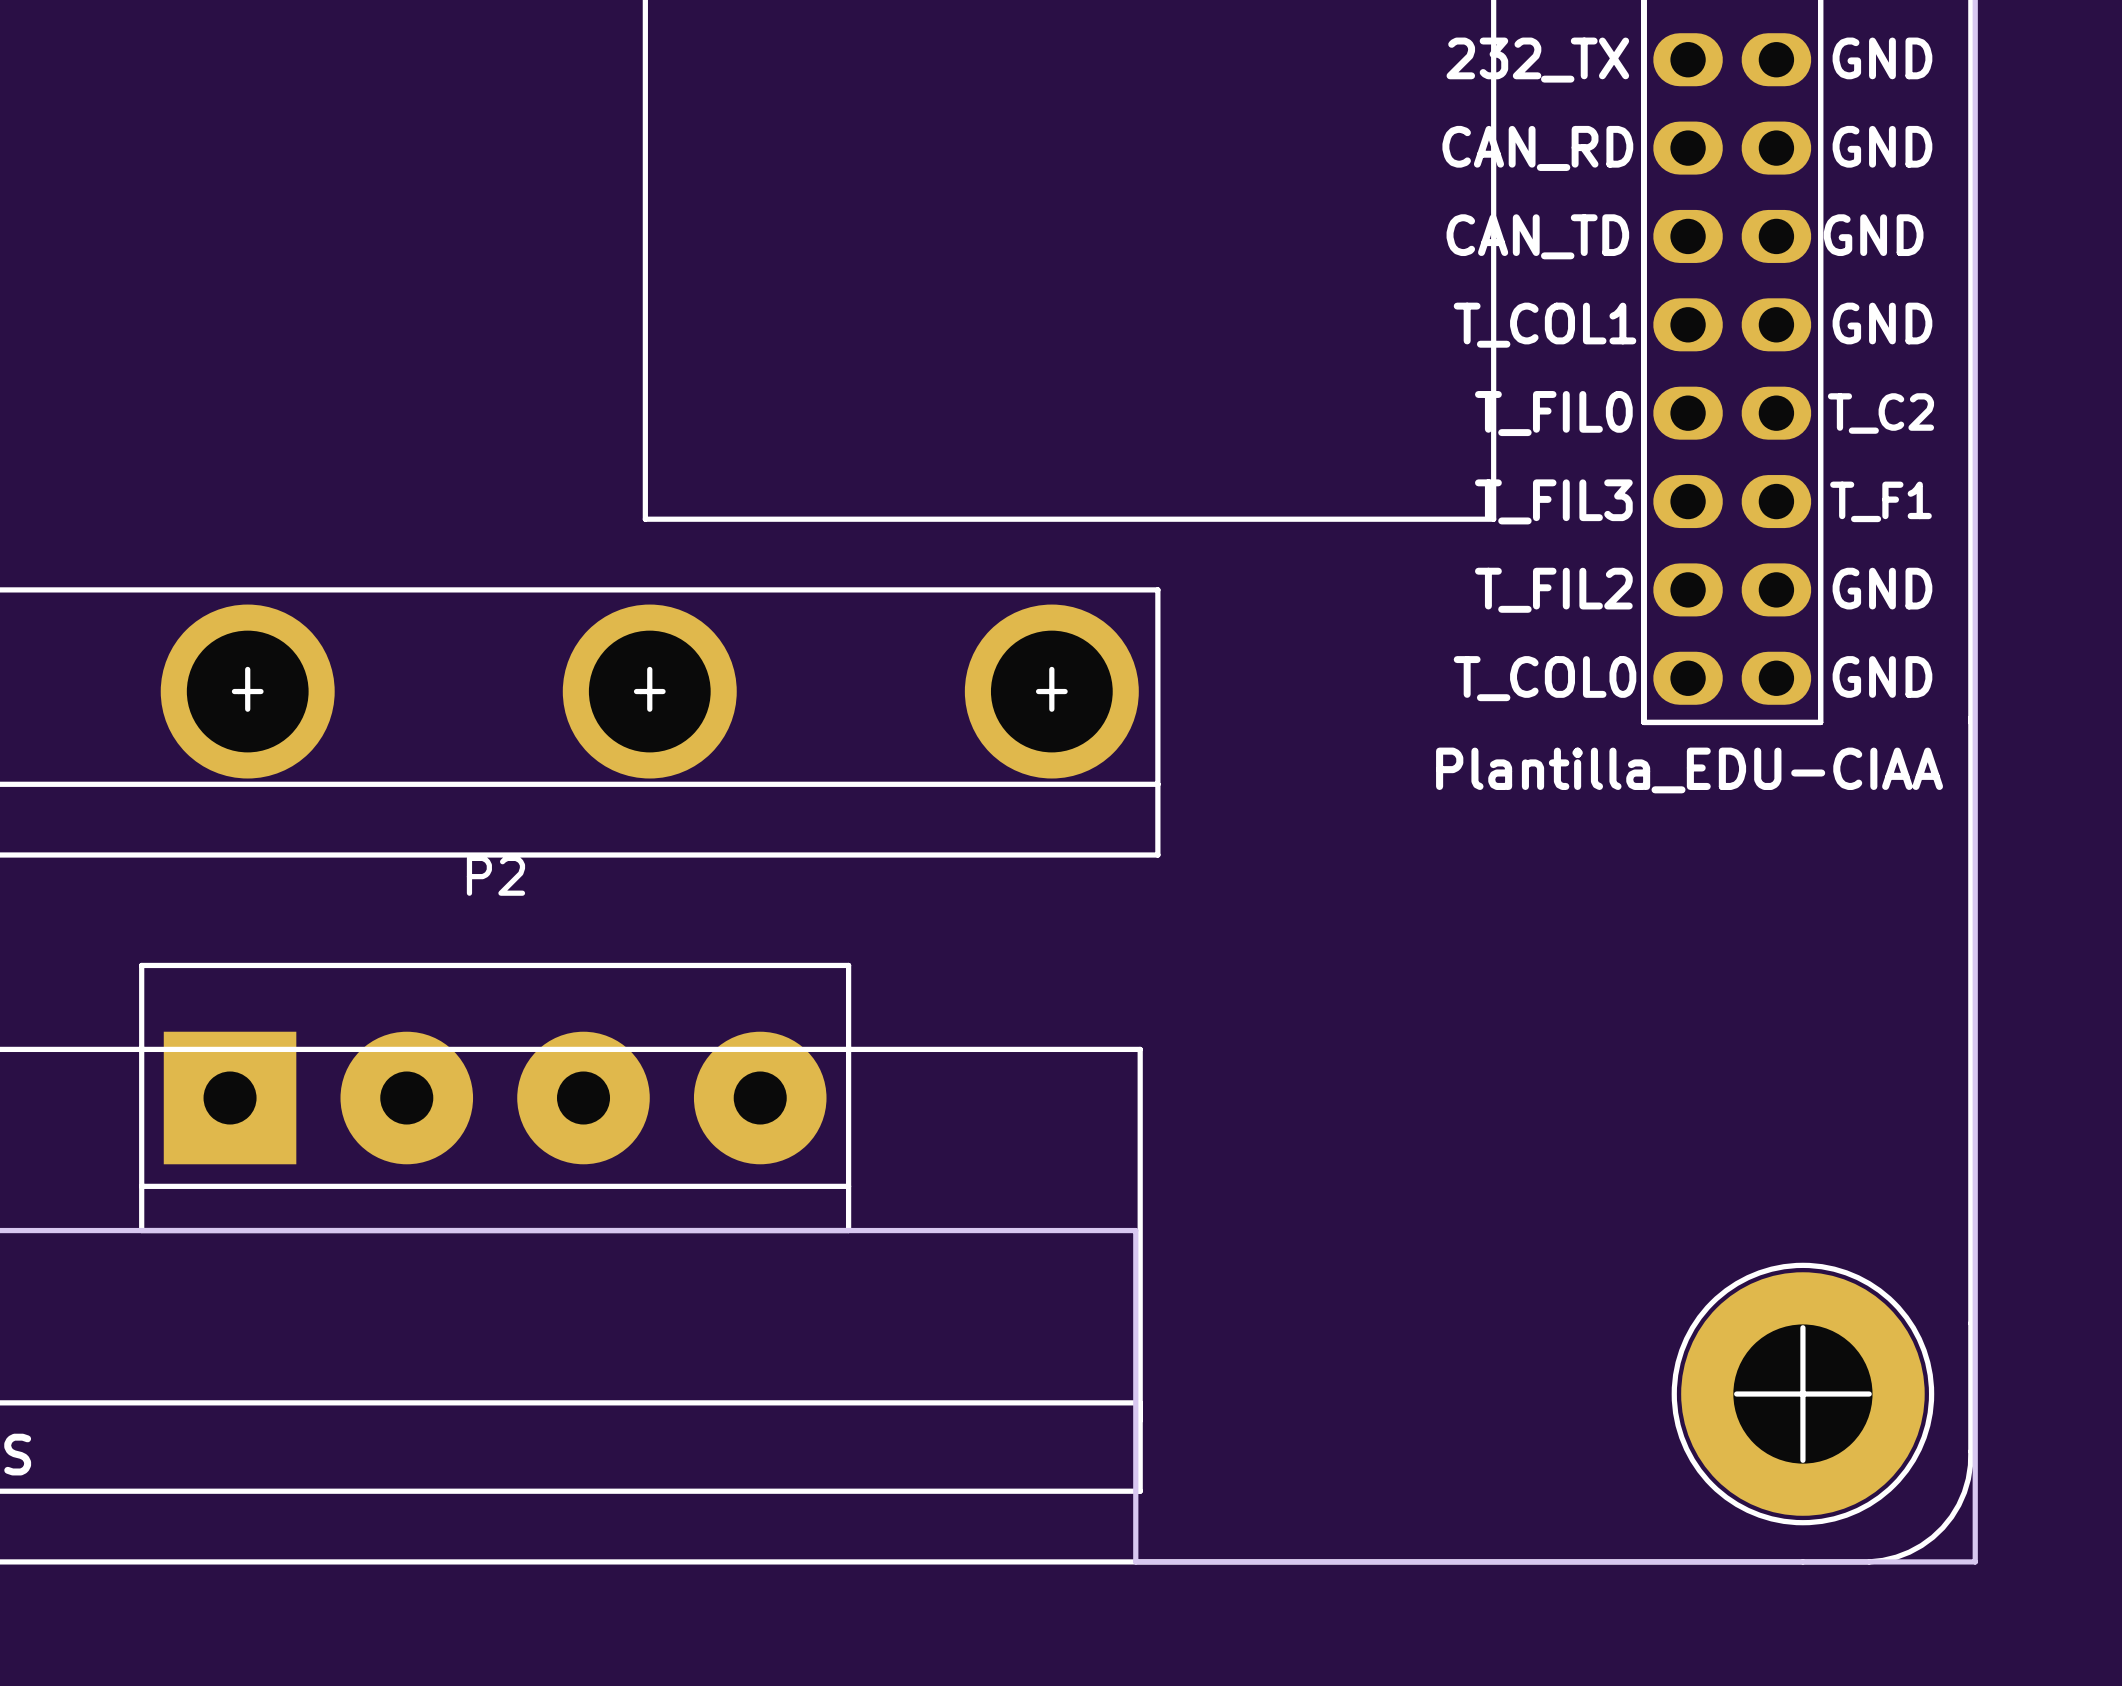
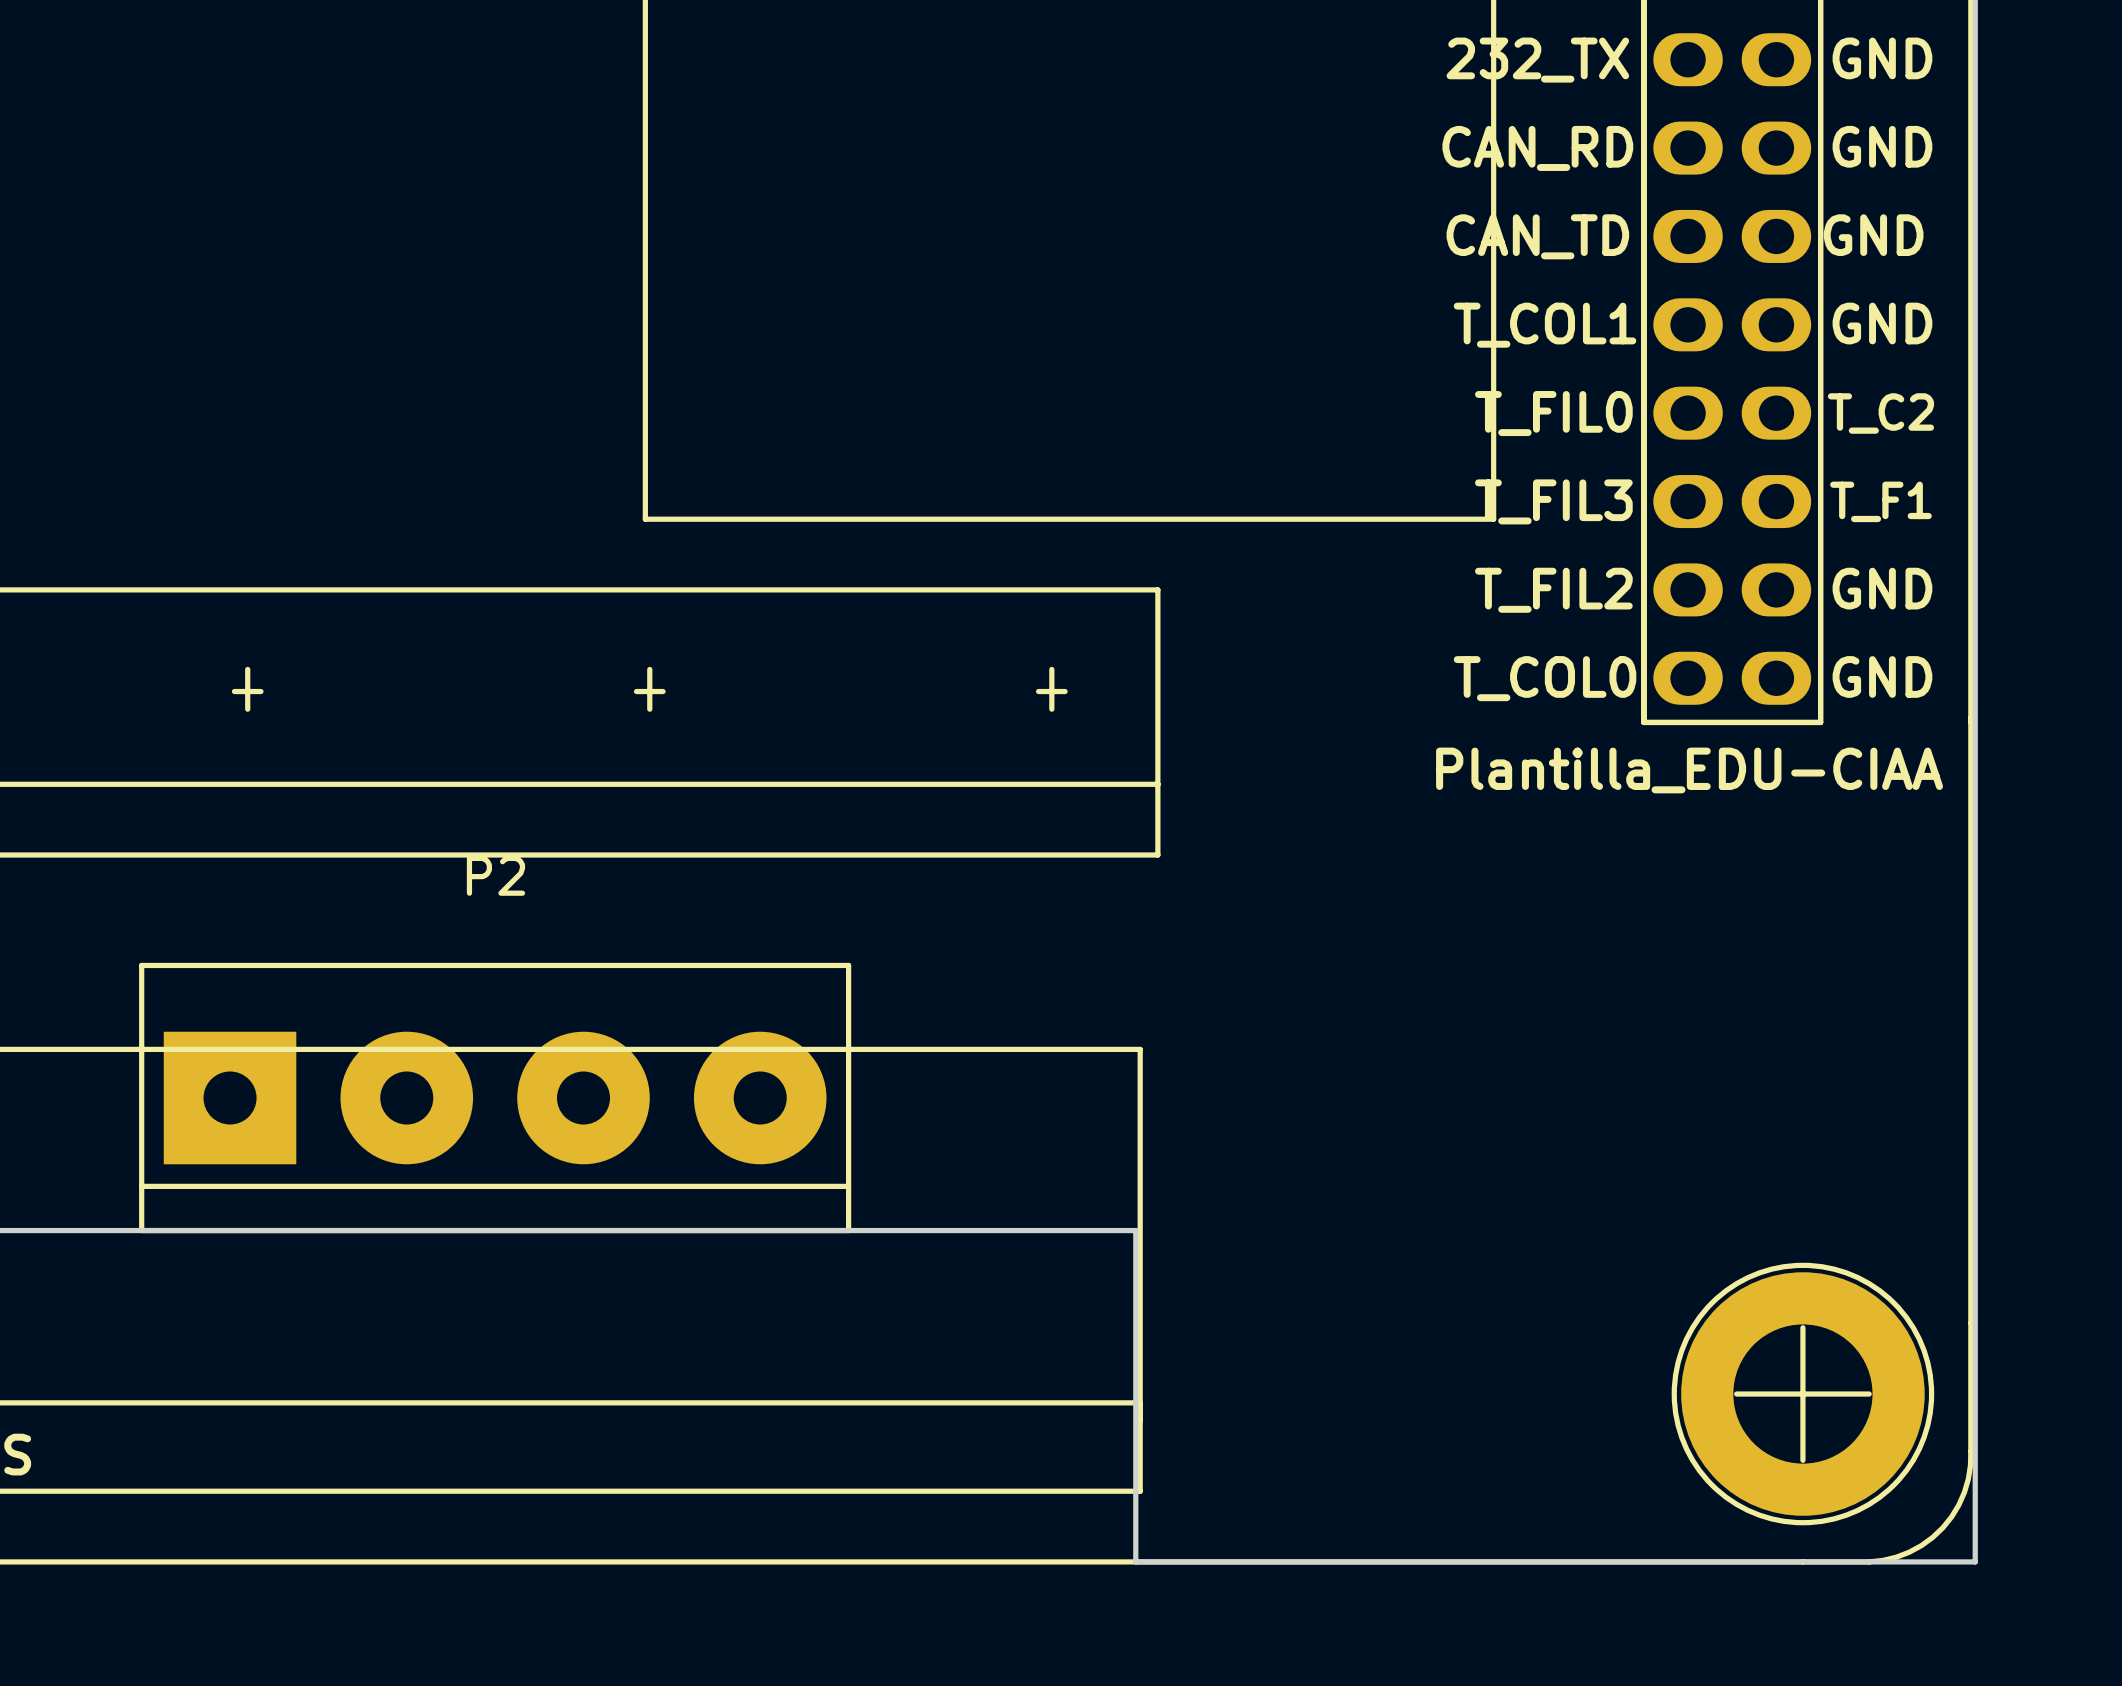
part: (247, 691) -> none
part: (649, 691) -> none
part: (1051, 691) -> none

